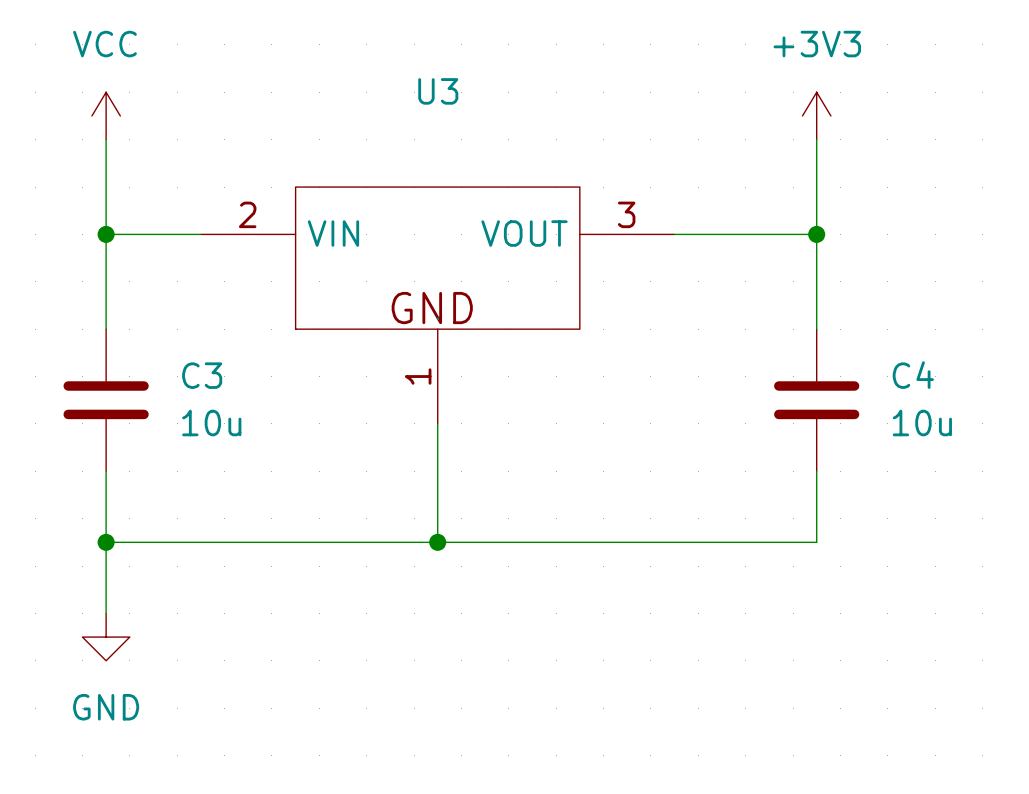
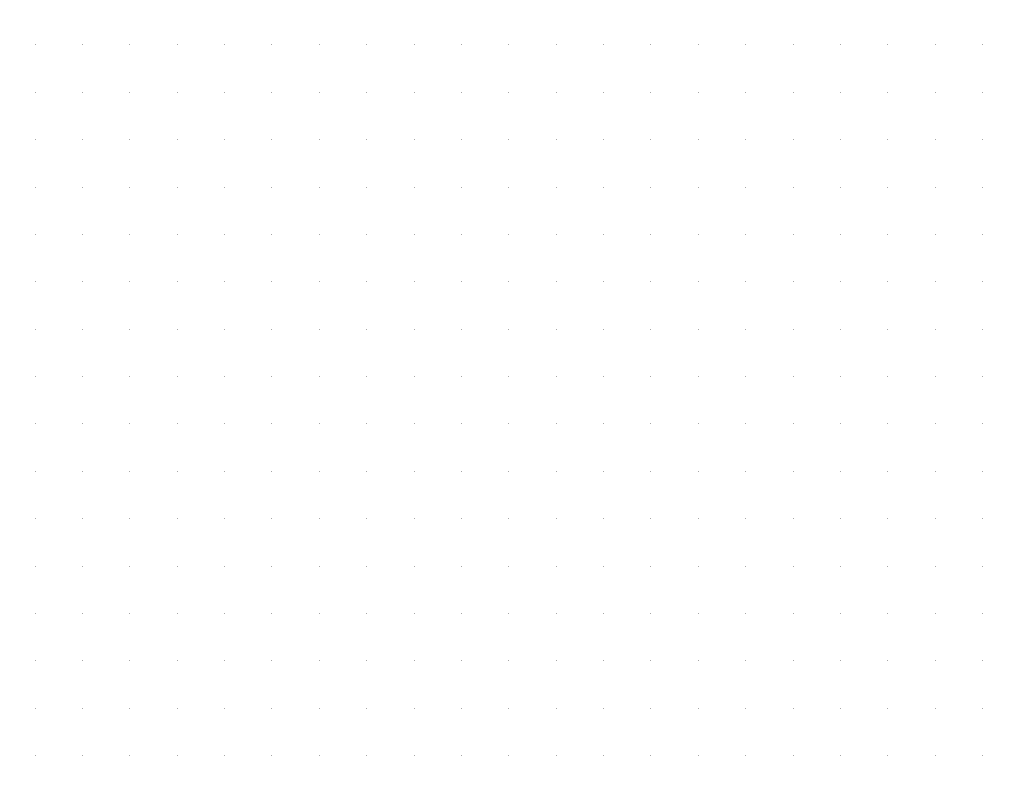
power symbol: VCC (106, 115) -> none
power symbol: +3V3 (816, 115) -> none
wire: (106, 139) (106, 329) -> none
wire: (816, 139) (816, 329) -> none
wire: (106, 234) (200, 234) -> none
junction: (106, 234) -> none
wire: (674, 234) (816, 234) -> none
junction: (816, 234) -> none
U3: (437, 305) -> none
C3: 10u (106, 400) -> none
C4: 10u (816, 400) -> none
wire: (437, 423) (437, 542) -> none
wire: (106, 471) (106, 613) -> none
wire: (816, 471) (816, 542) (106, 542) -> none
junction: (106, 542) -> none
junction: (437, 542) -> none
power symbol: GND (106, 637) -> none

